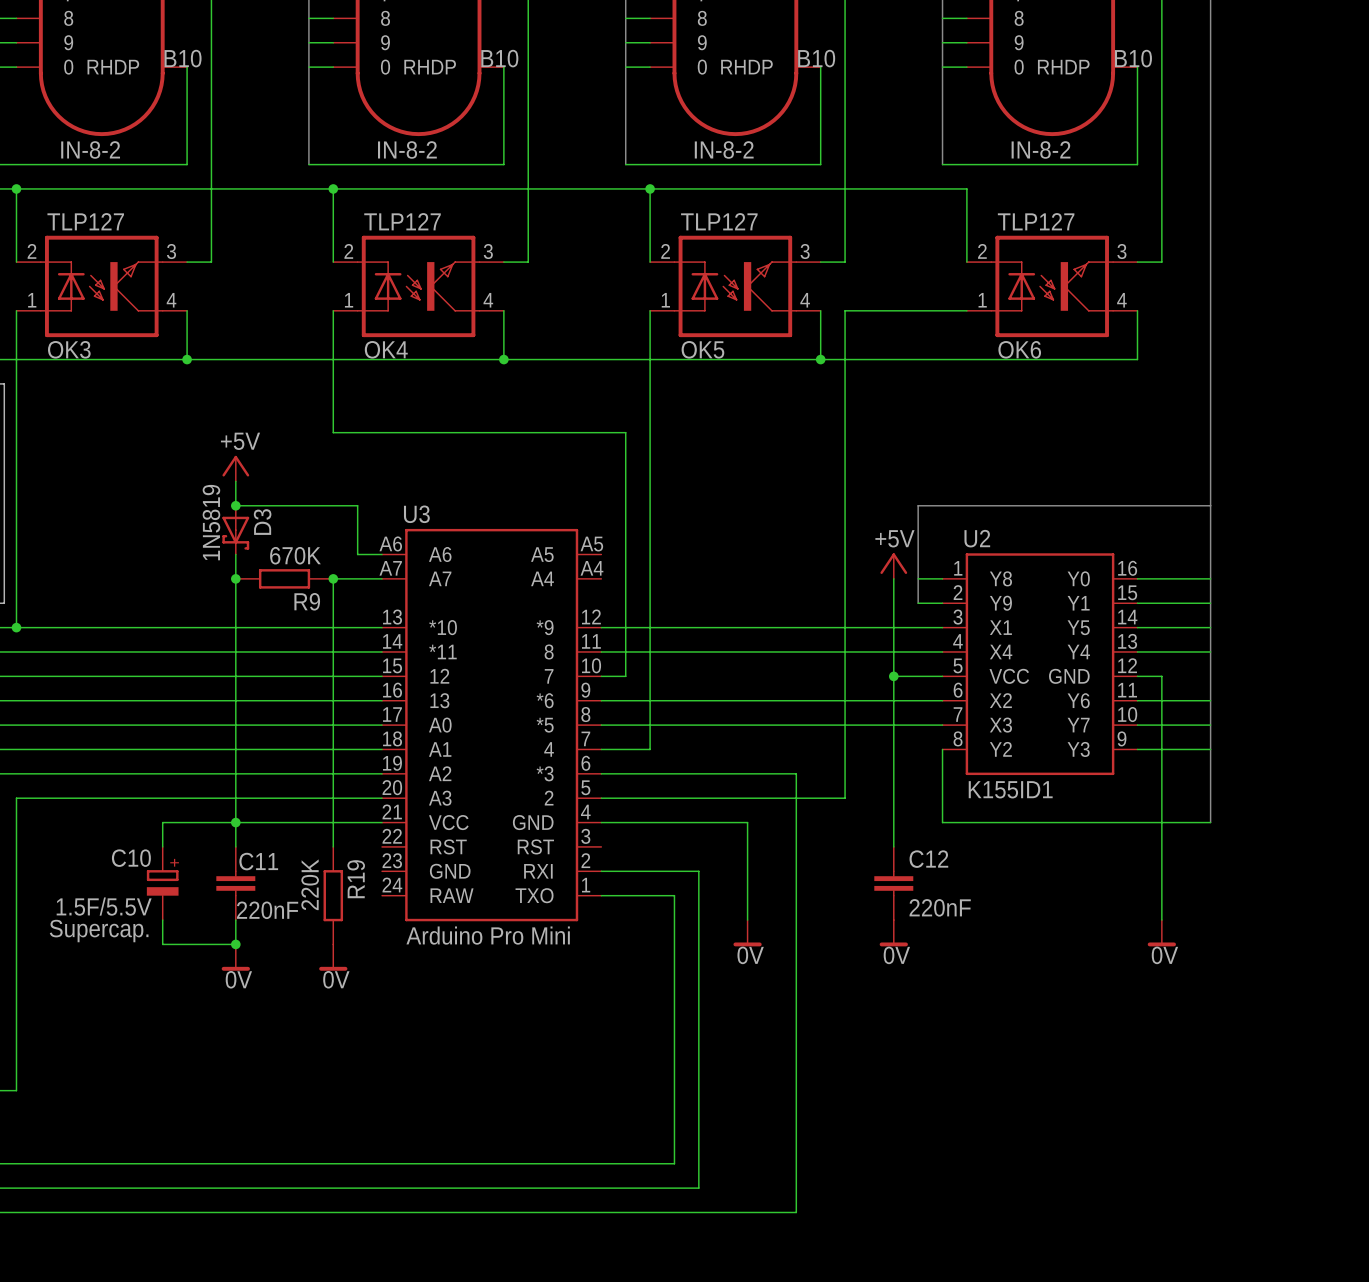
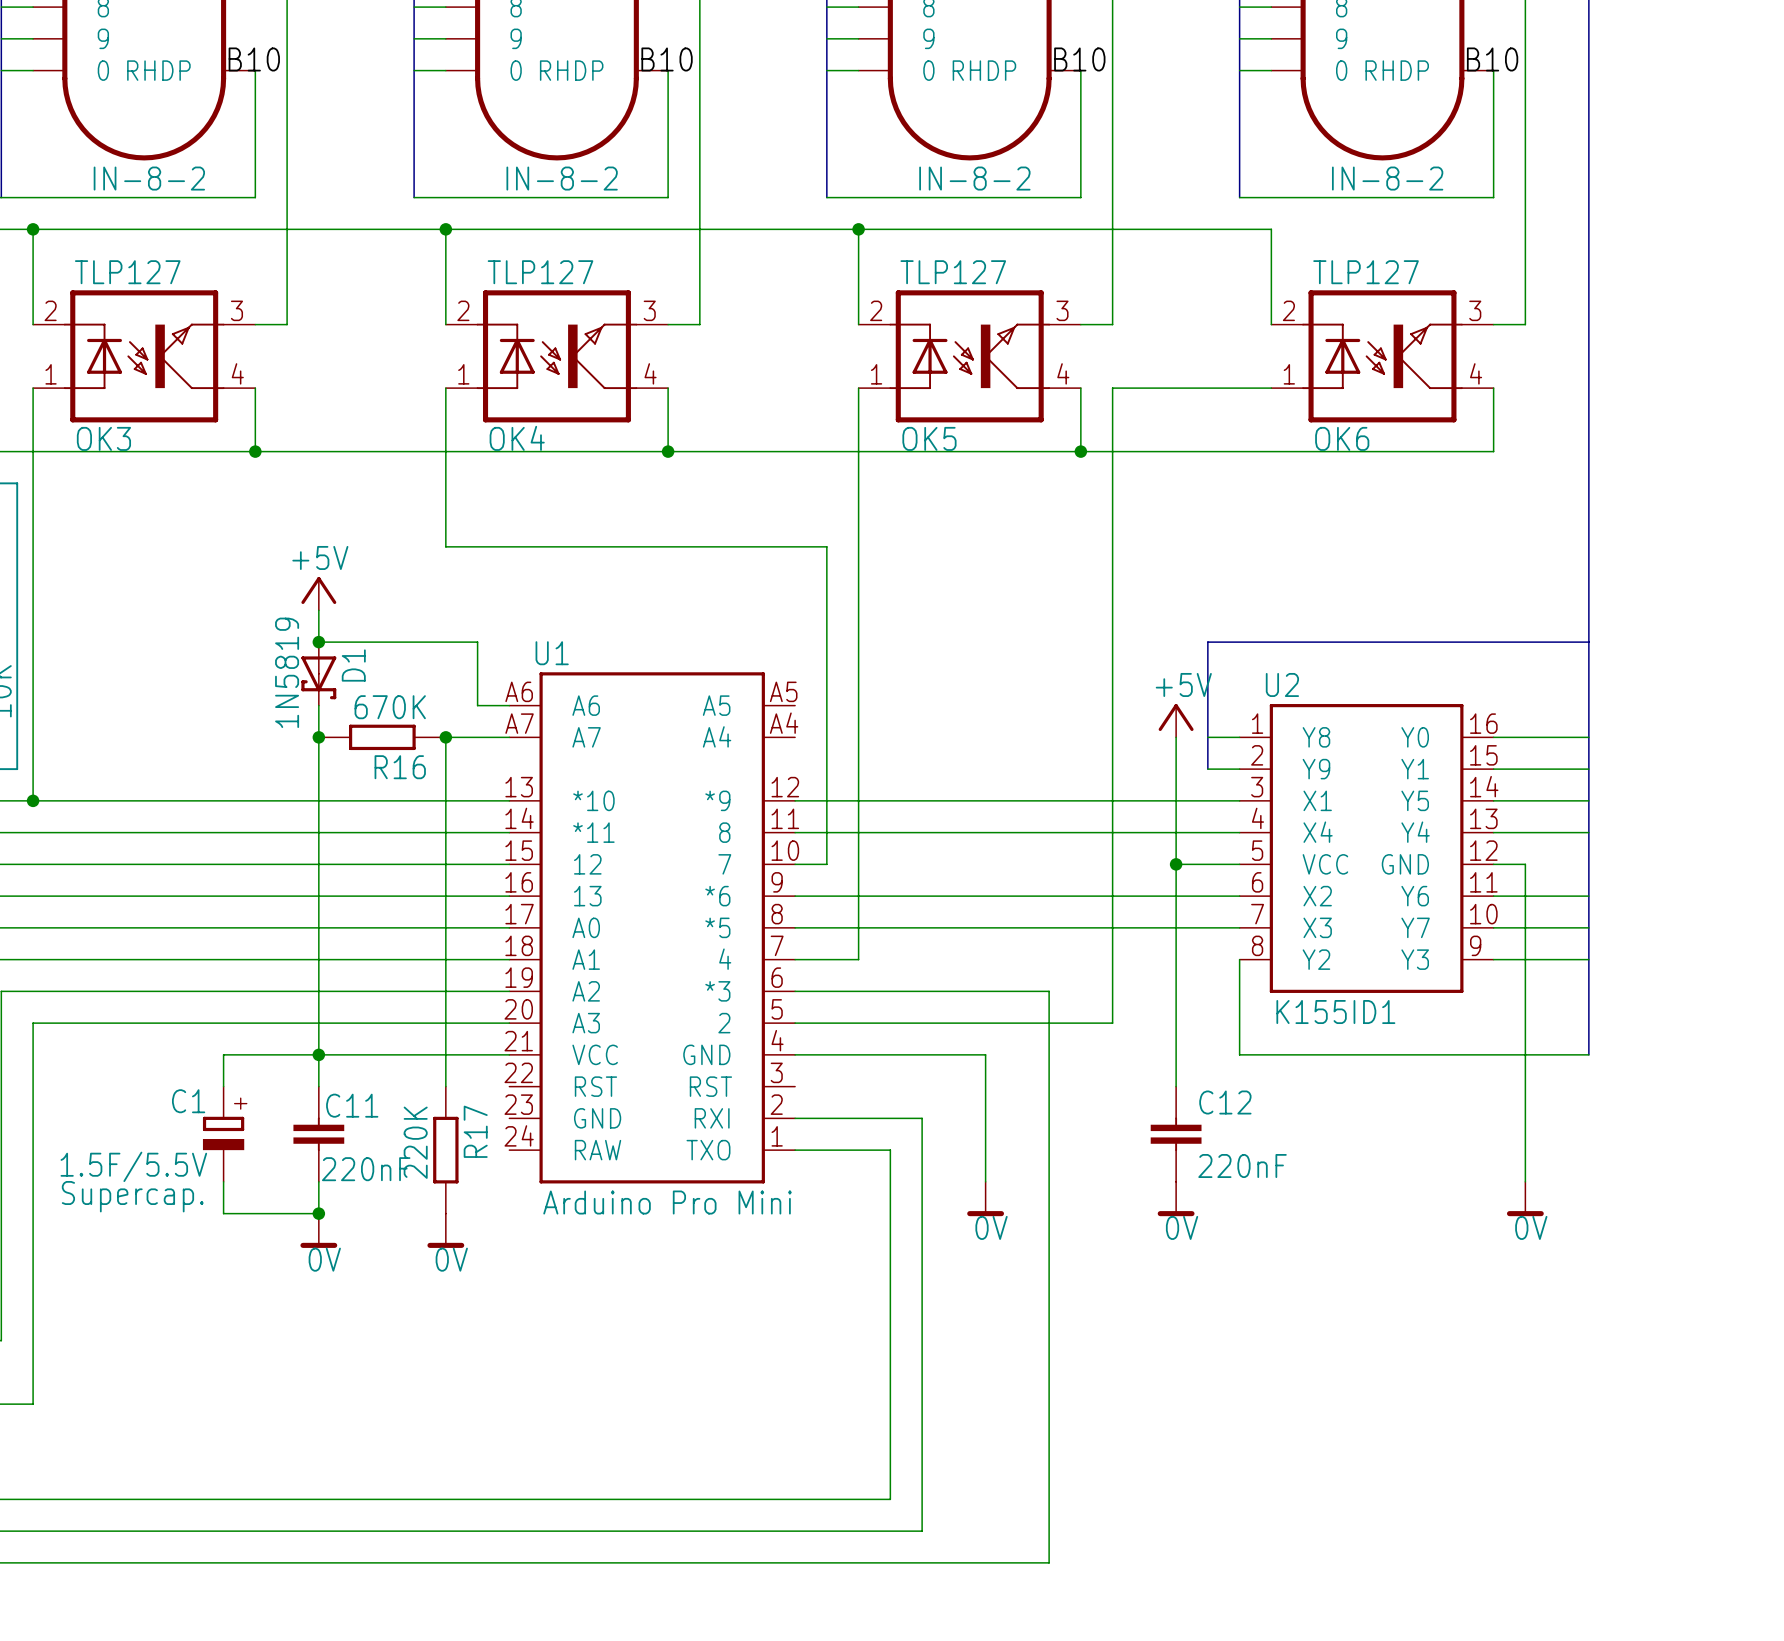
U3 name: U3 (416, 514) -> U1 (552, 653)
D3 name: D3 (262, 522) -> D1 (353, 665)
R9 name: R9 (307, 601) -> R16 (400, 767)
C10 name: C10 (131, 858) -> C1 (188, 1101)
R19 name: R19 (356, 879) -> R17 (475, 1131)

